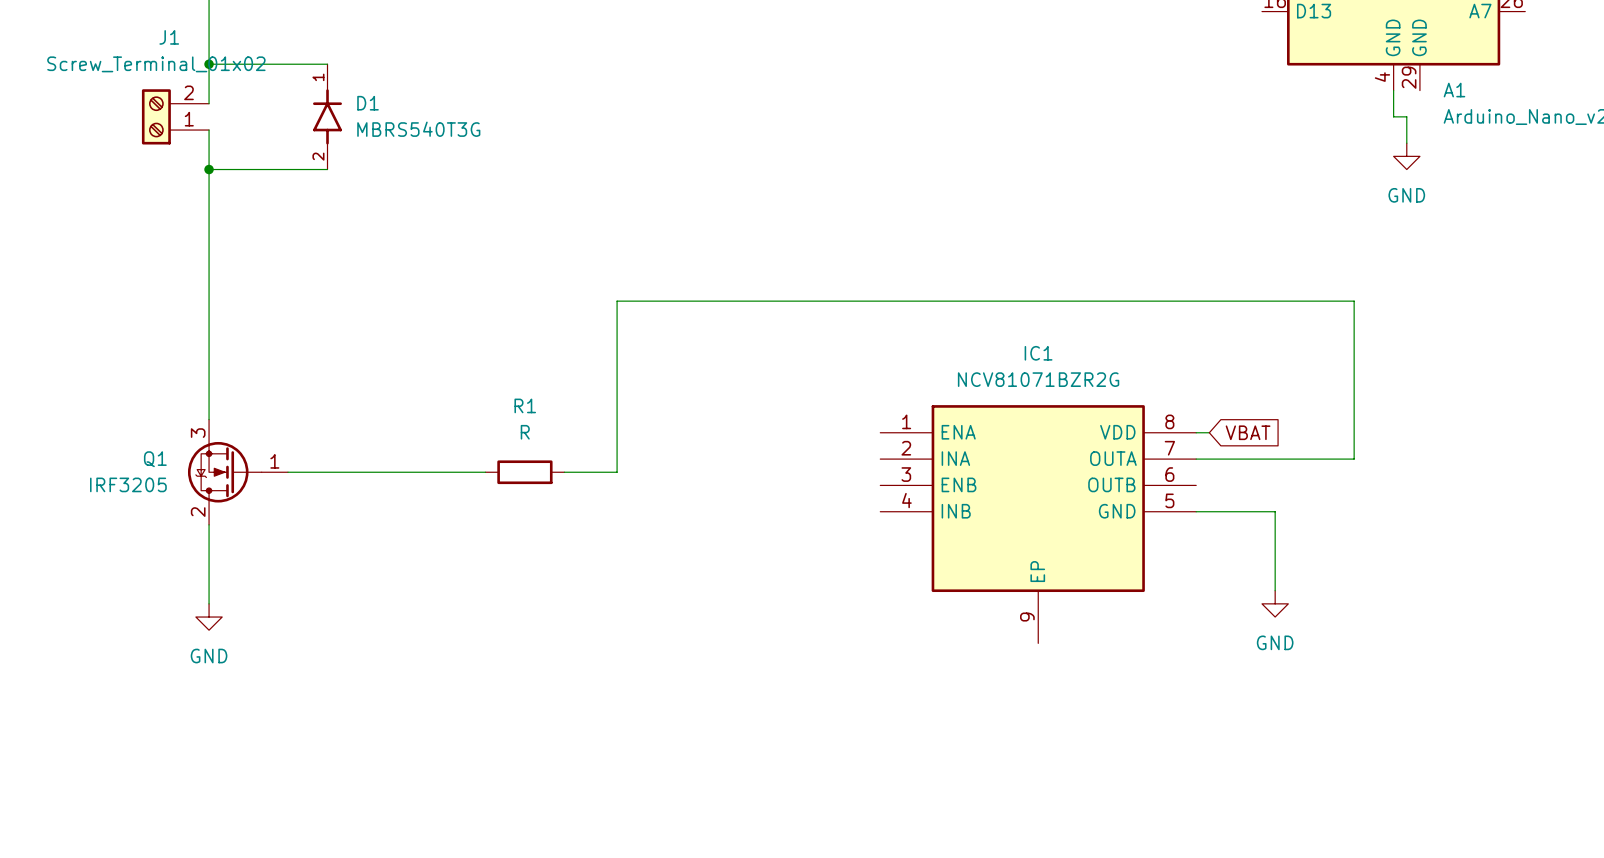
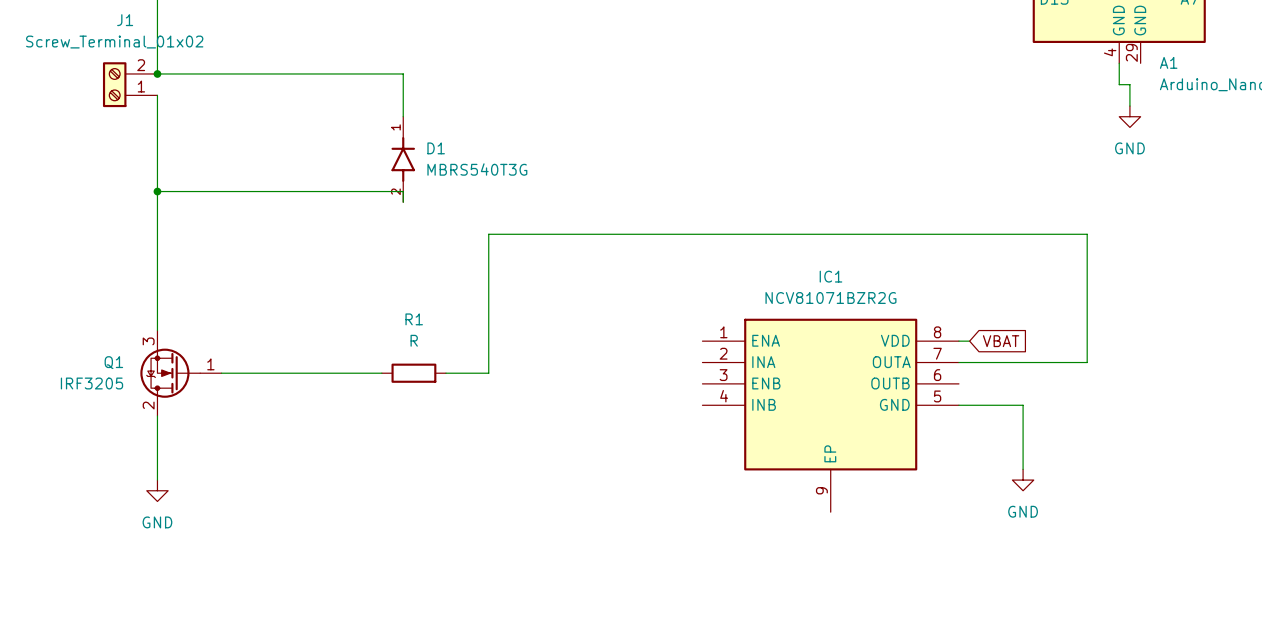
wire: (209, 64) (327, 64) -> none
junction: (209, 64) -> none
wire: none -> (157, 73) (403, 73) (403, 116)
junction: none -> (157, 73)
D1 position: (327, 116) -> (403, 159)
wire: (209, 169) (327, 169) -> none
junction: (209, 169) -> none
wire: none -> (157, 191) (403, 191) (403, 202)
junction: none -> (157, 191)

